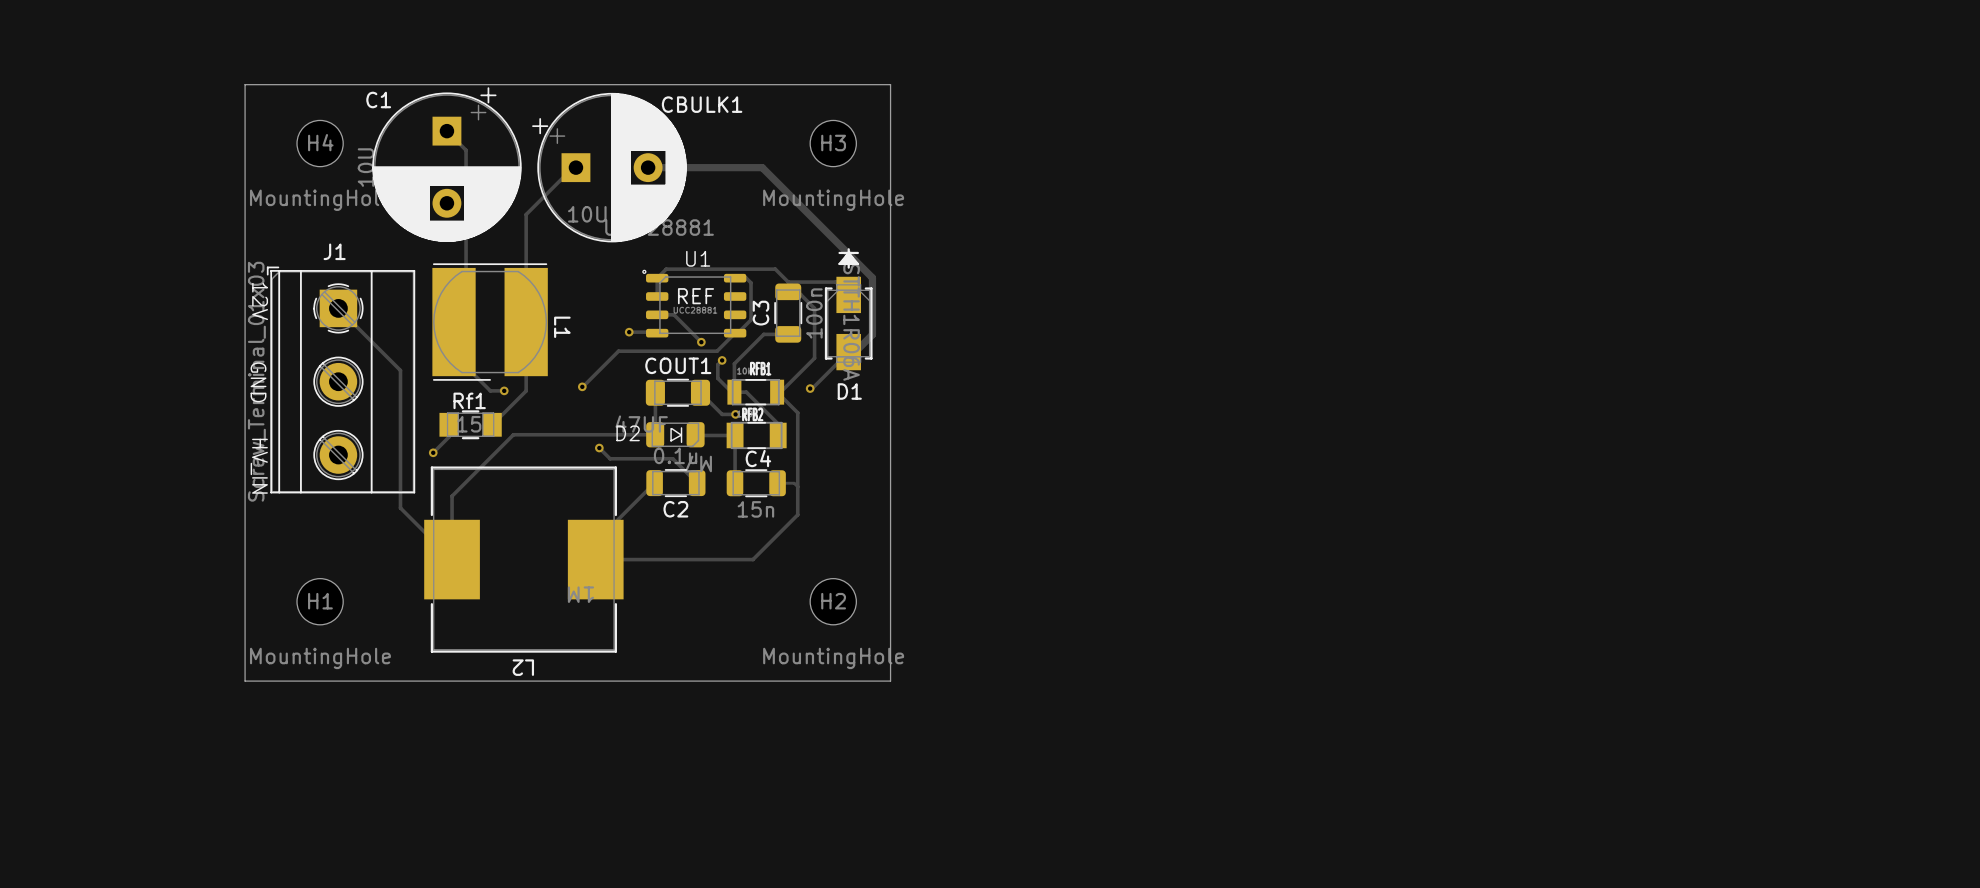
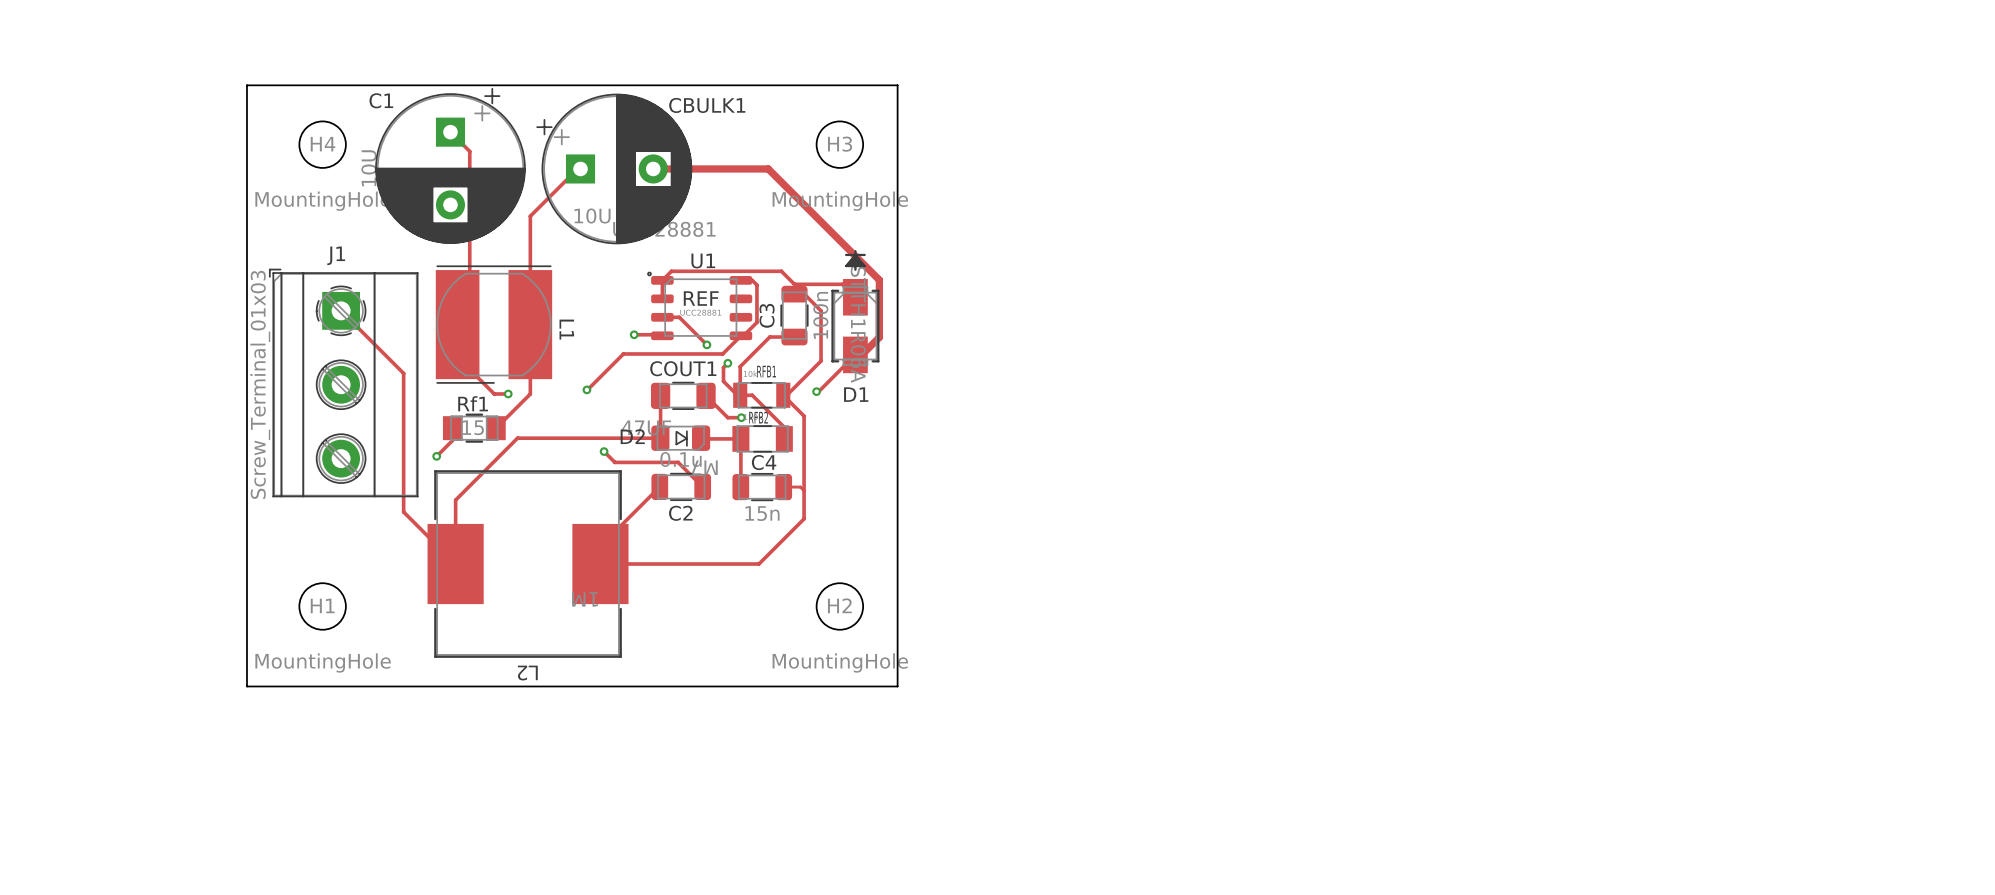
text: 12V (260, 301) -> none
text: GND (258, 382) -> none
text: HV_IN (259, 466) -> none

